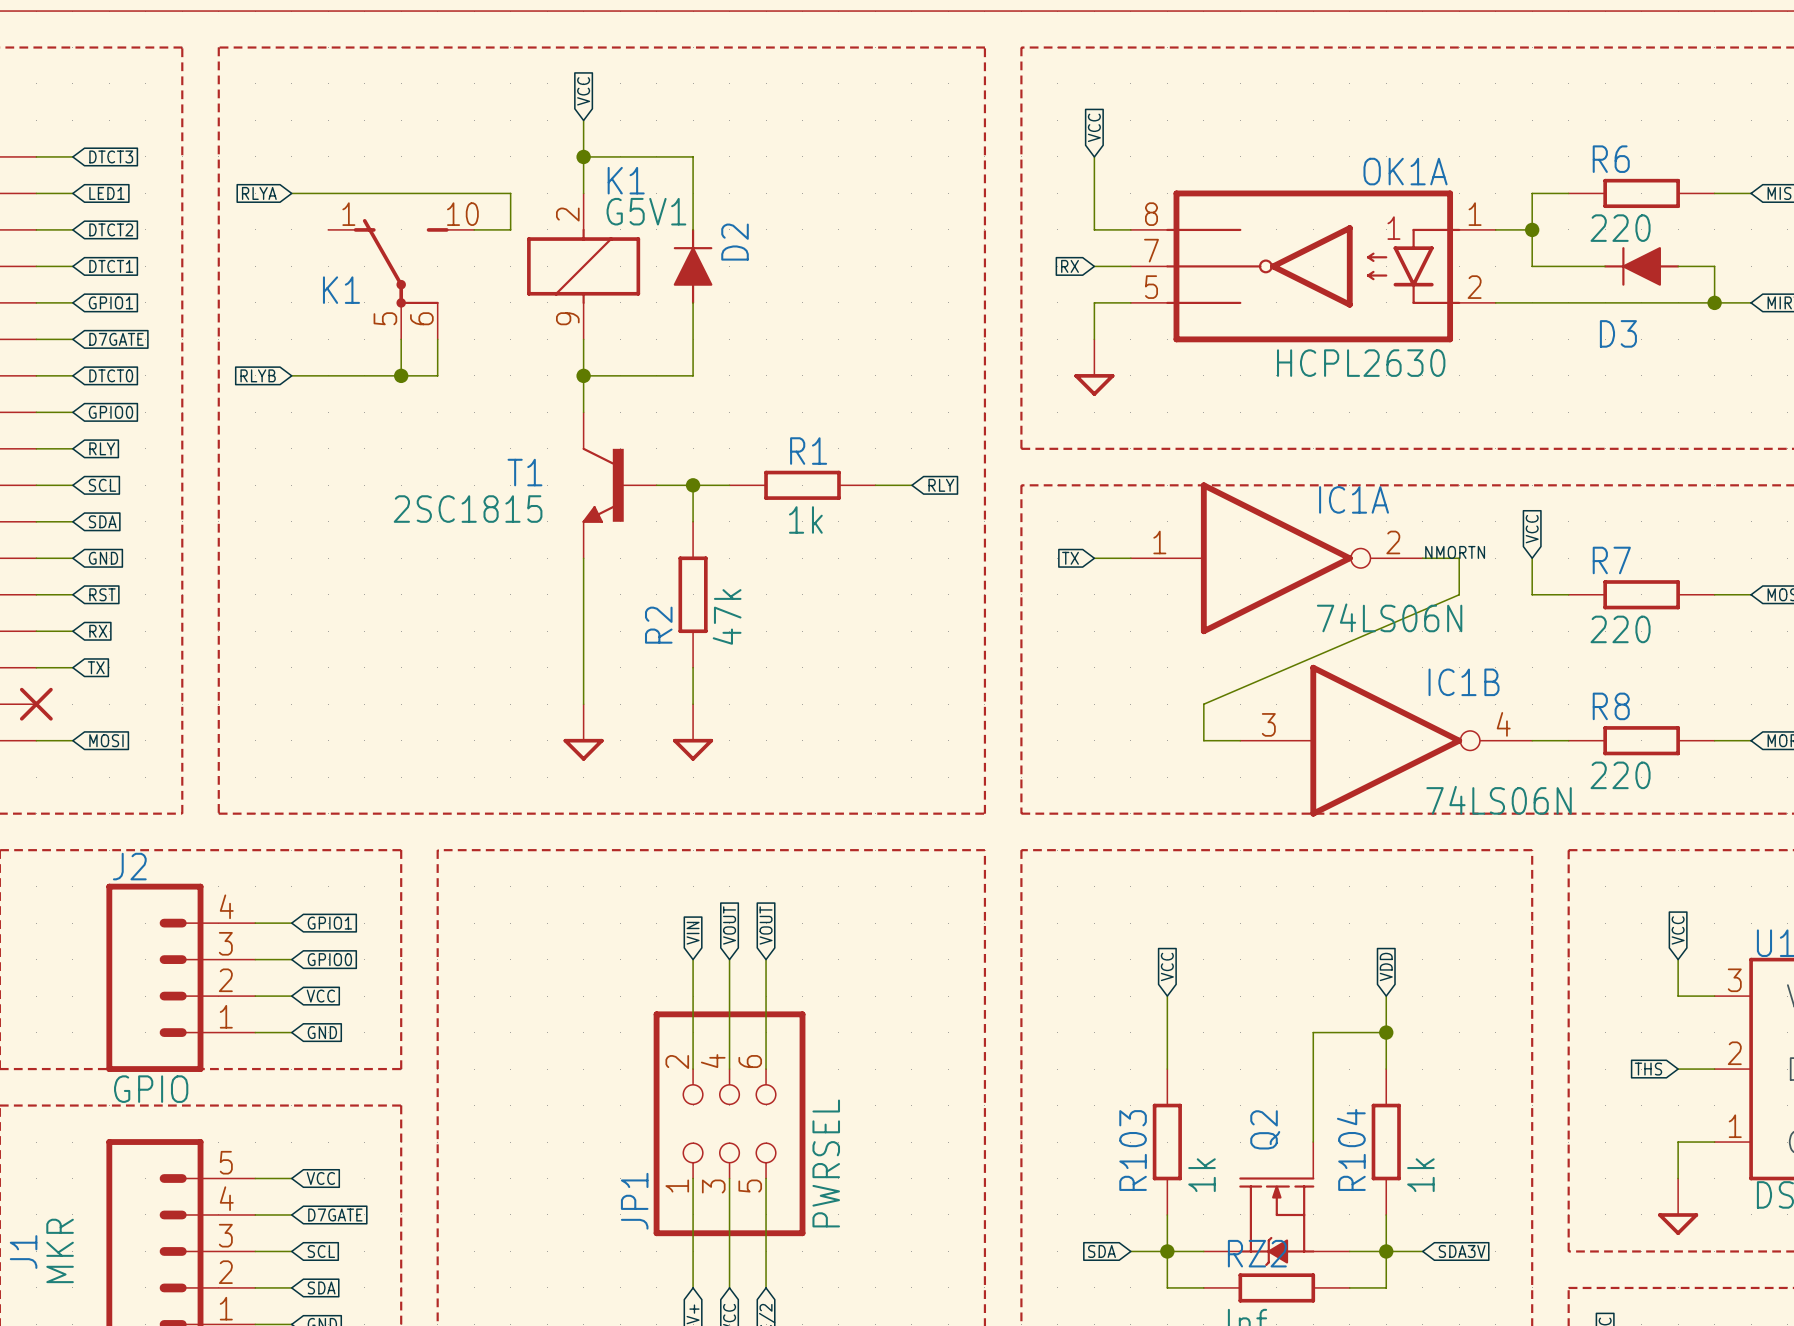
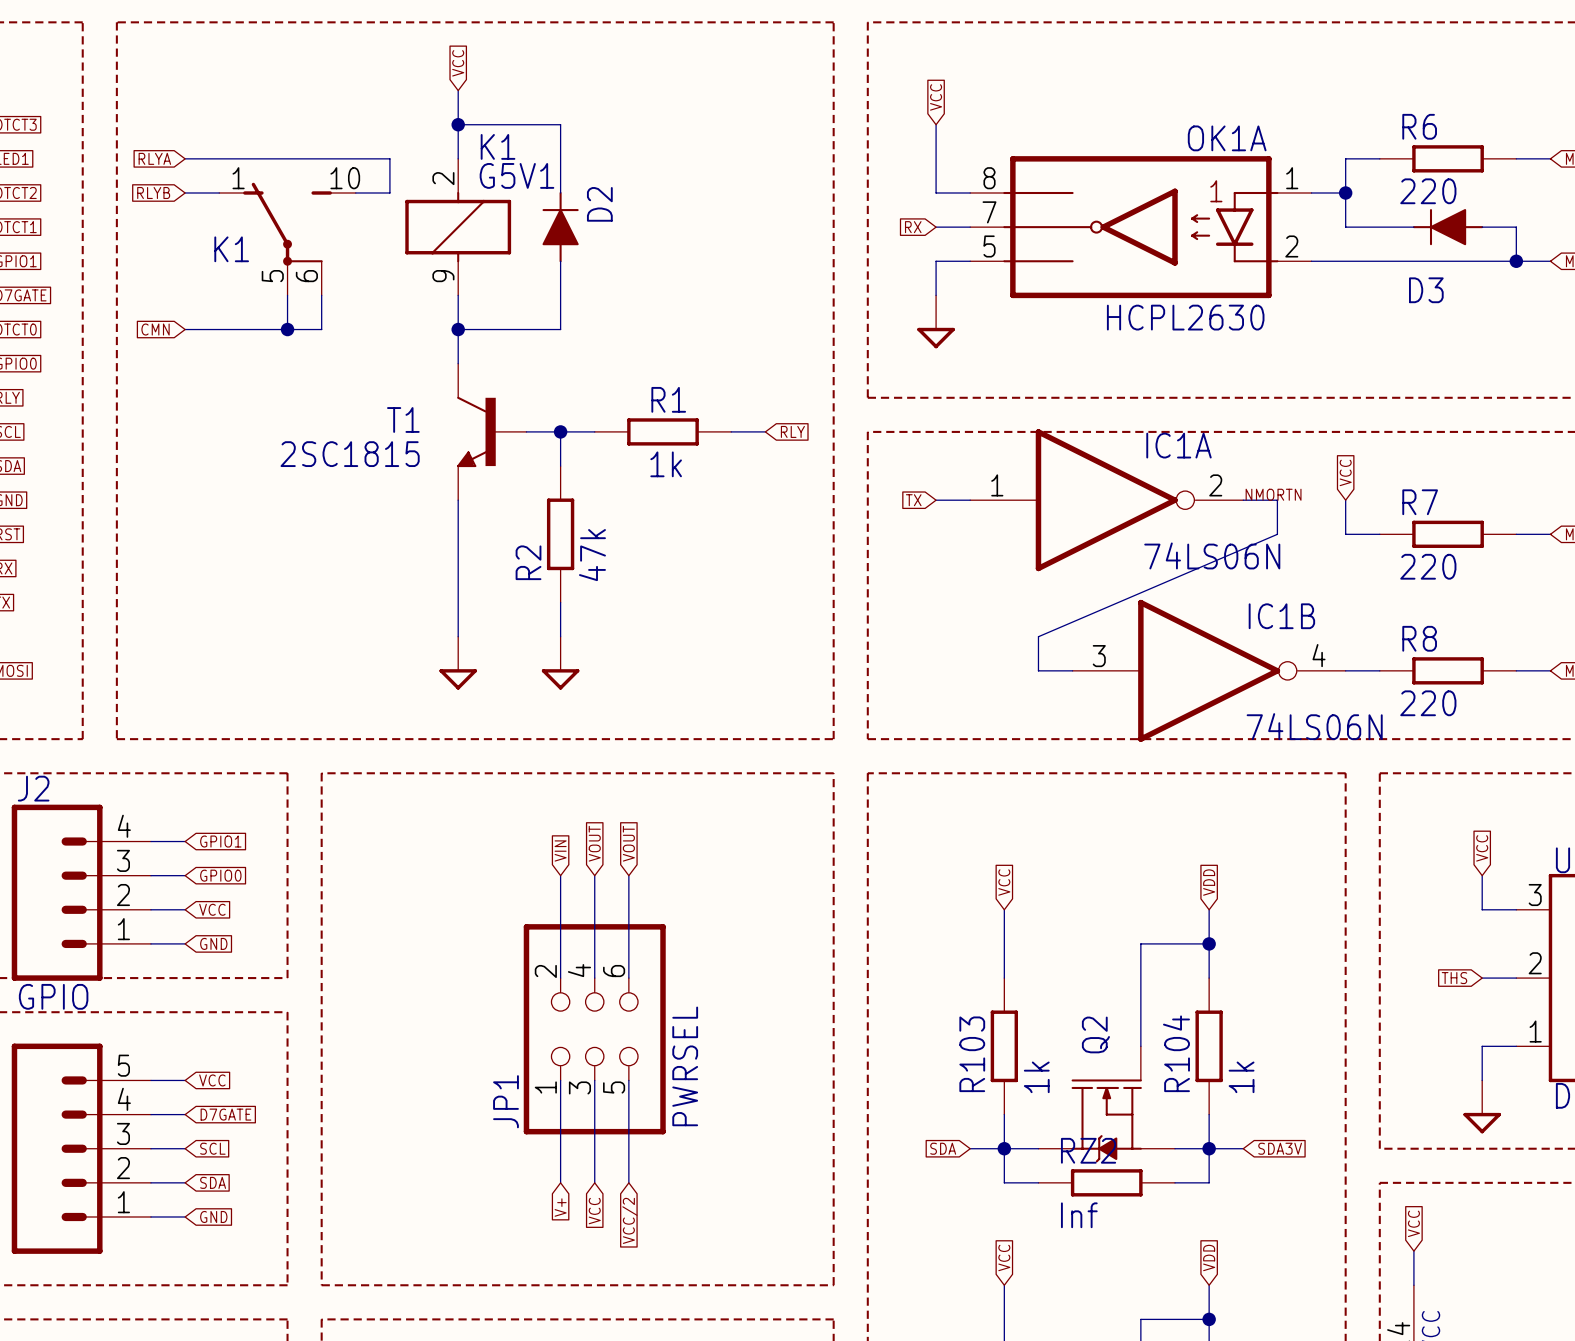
global label: none -> RLYB (153, 192)
wire: none -> (185, 192) (219, 192)
global label: RLYB (258, 375) -> CMN (155, 329)

